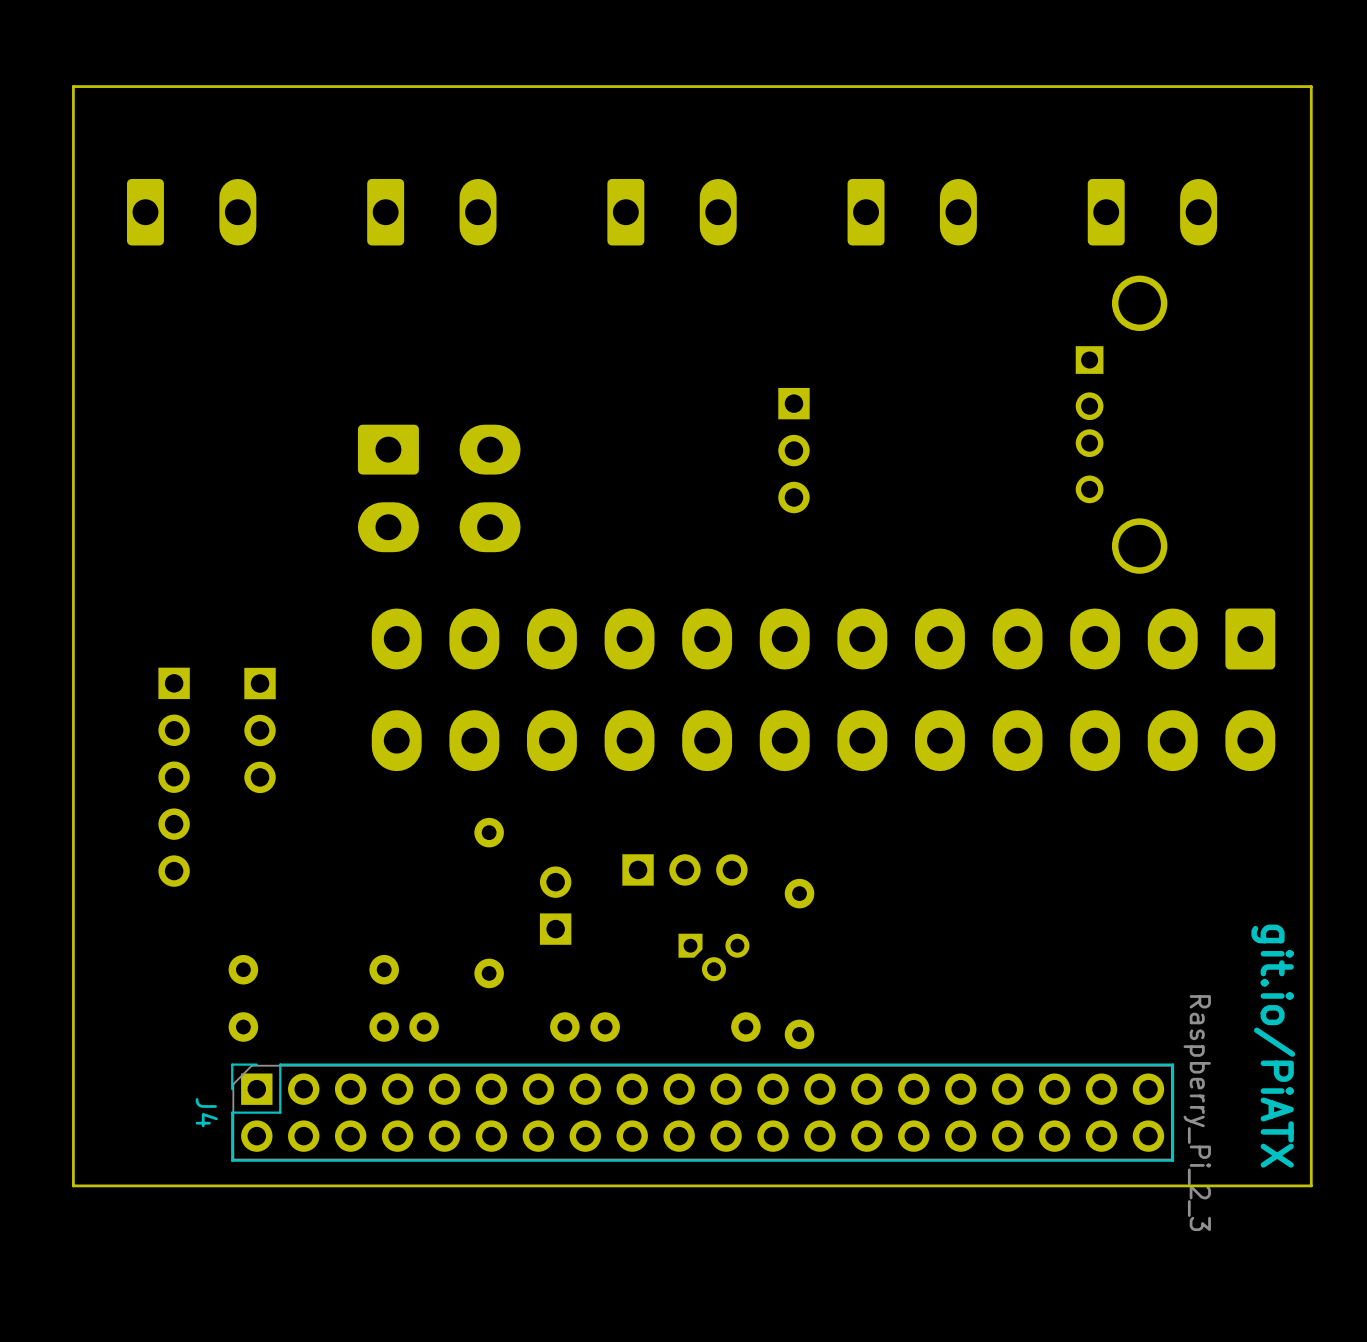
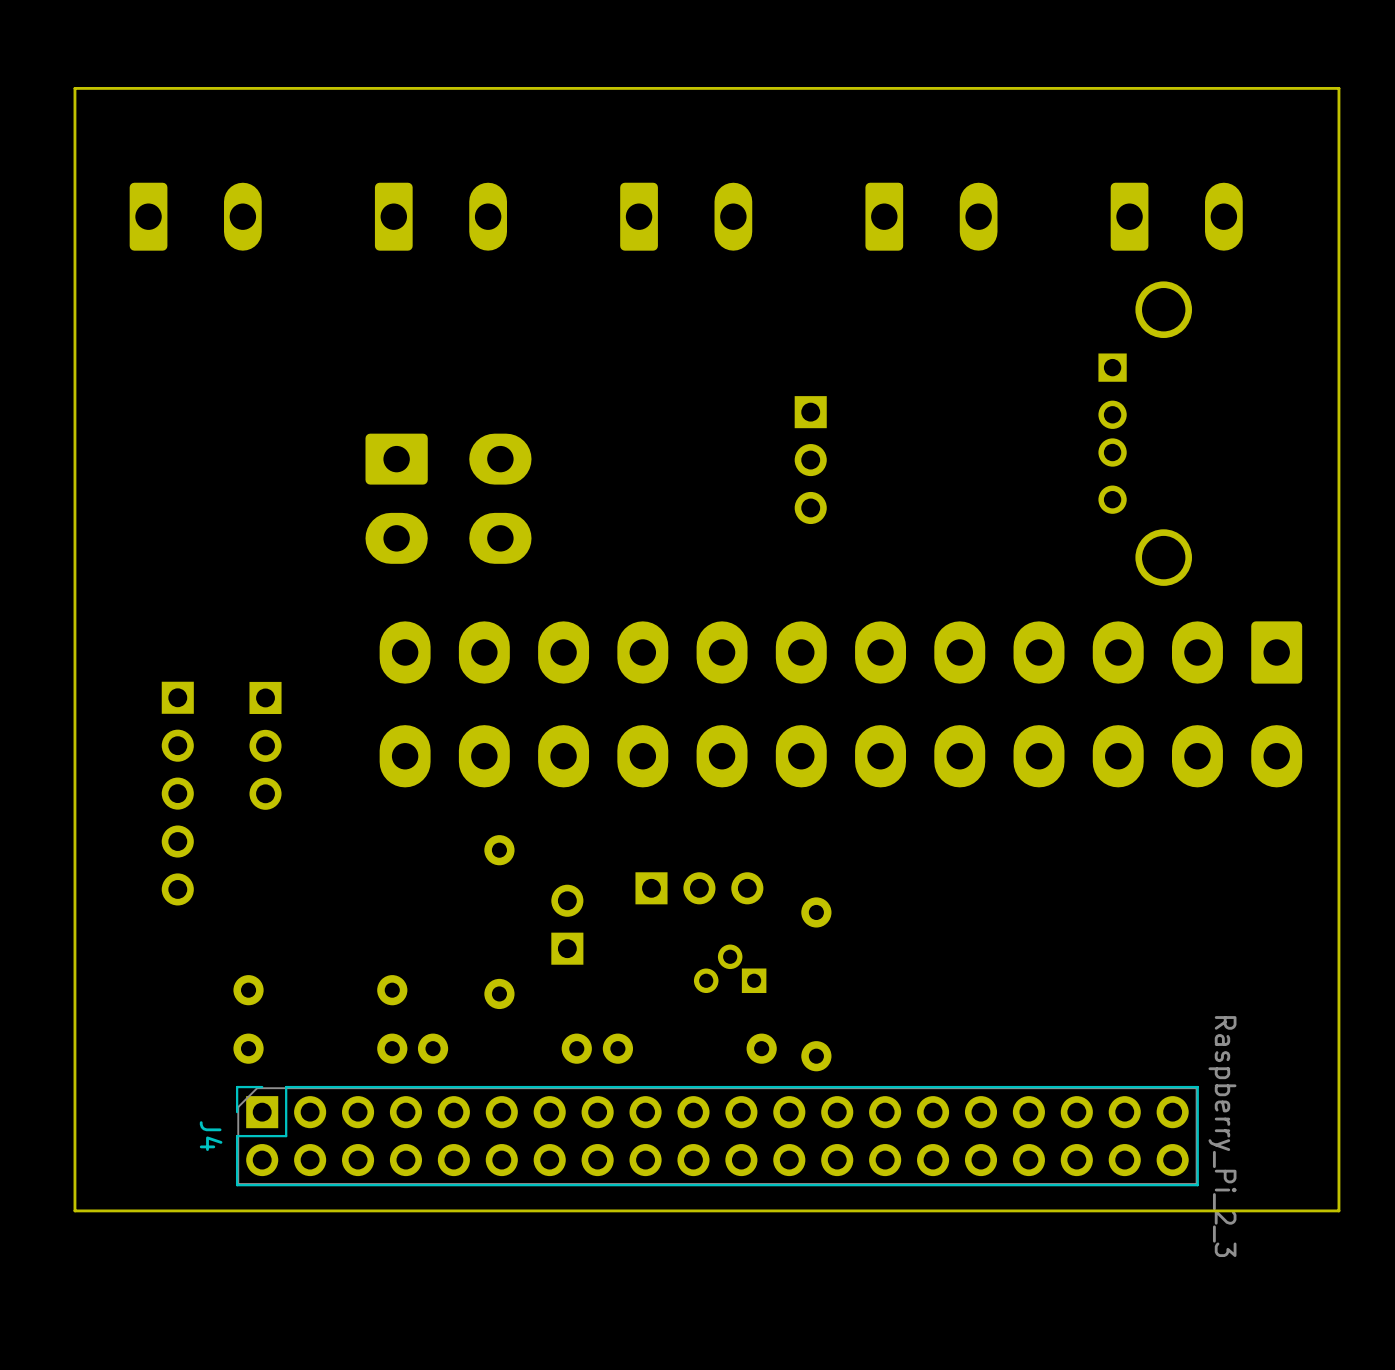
part footprint: [678, 933, 750, 982] -> [693, 944, 767, 994]
text: git.io/PiATX (1273, 1046) -> none

